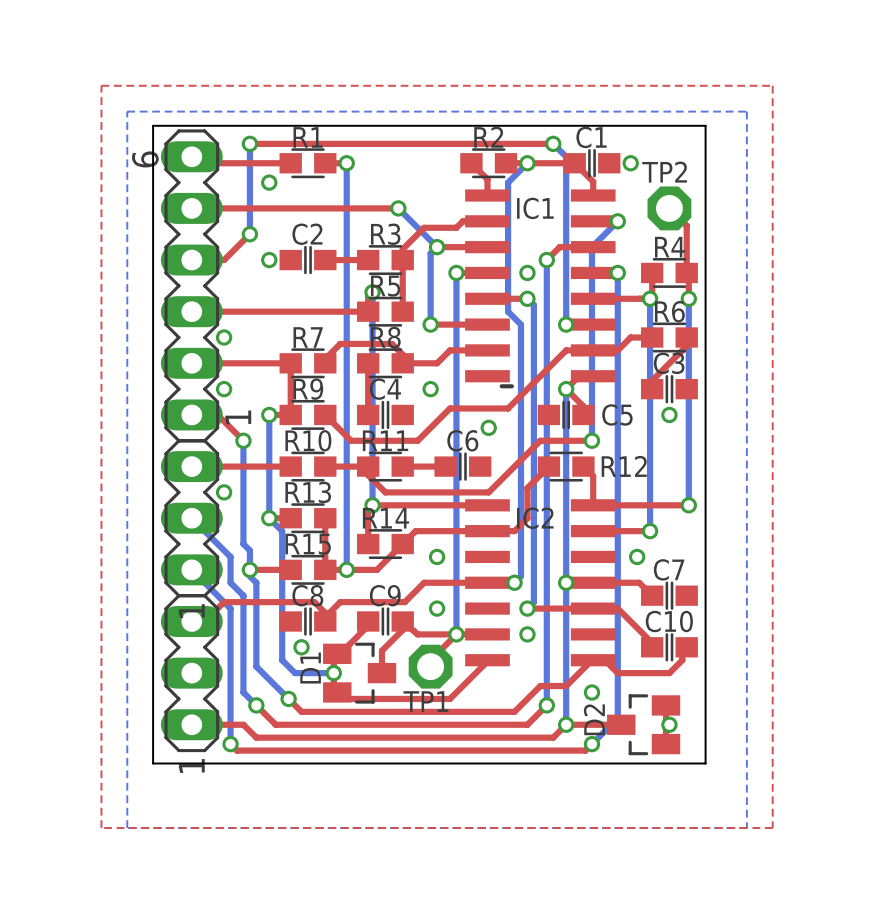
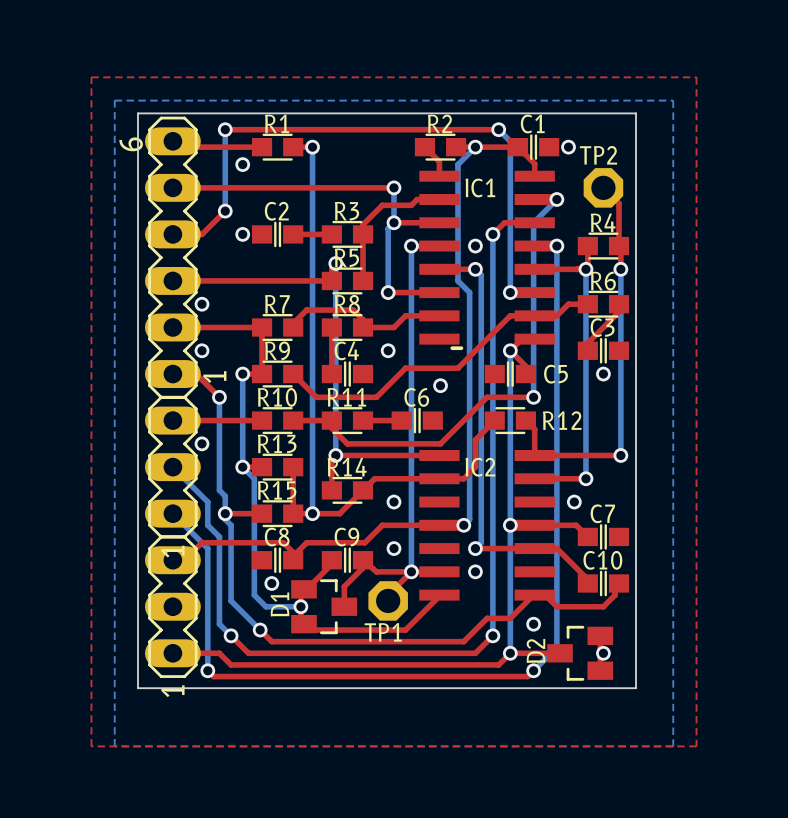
top track: none -> (359, 187) (393, 187)
bottom track: (398, 208) (437, 247) -> (393, 187) (393, 222)
via position: (398, 208) -> (393, 187)

